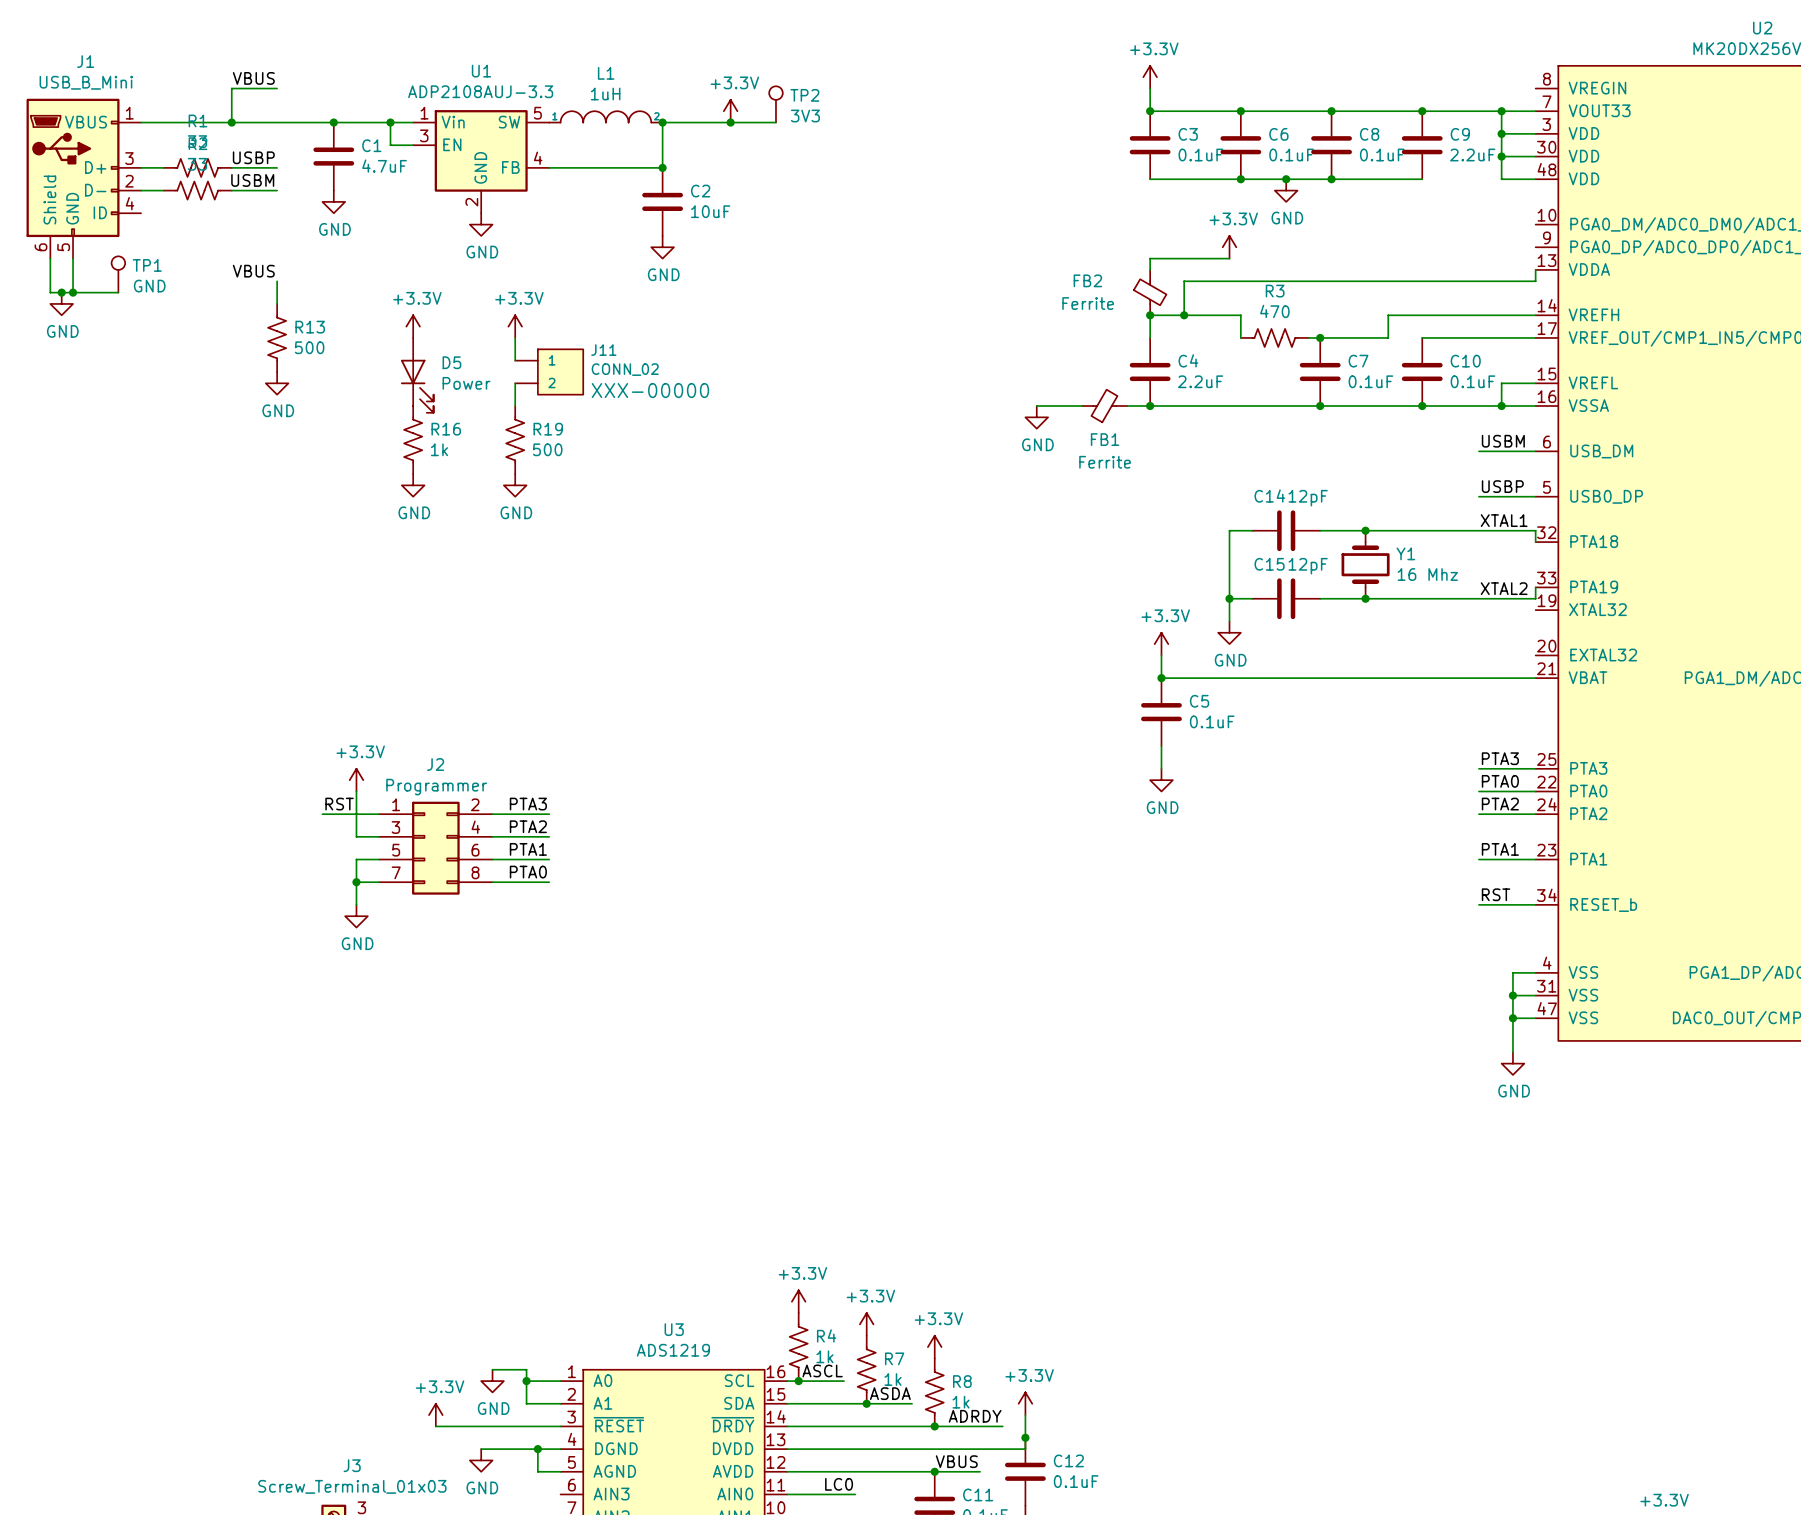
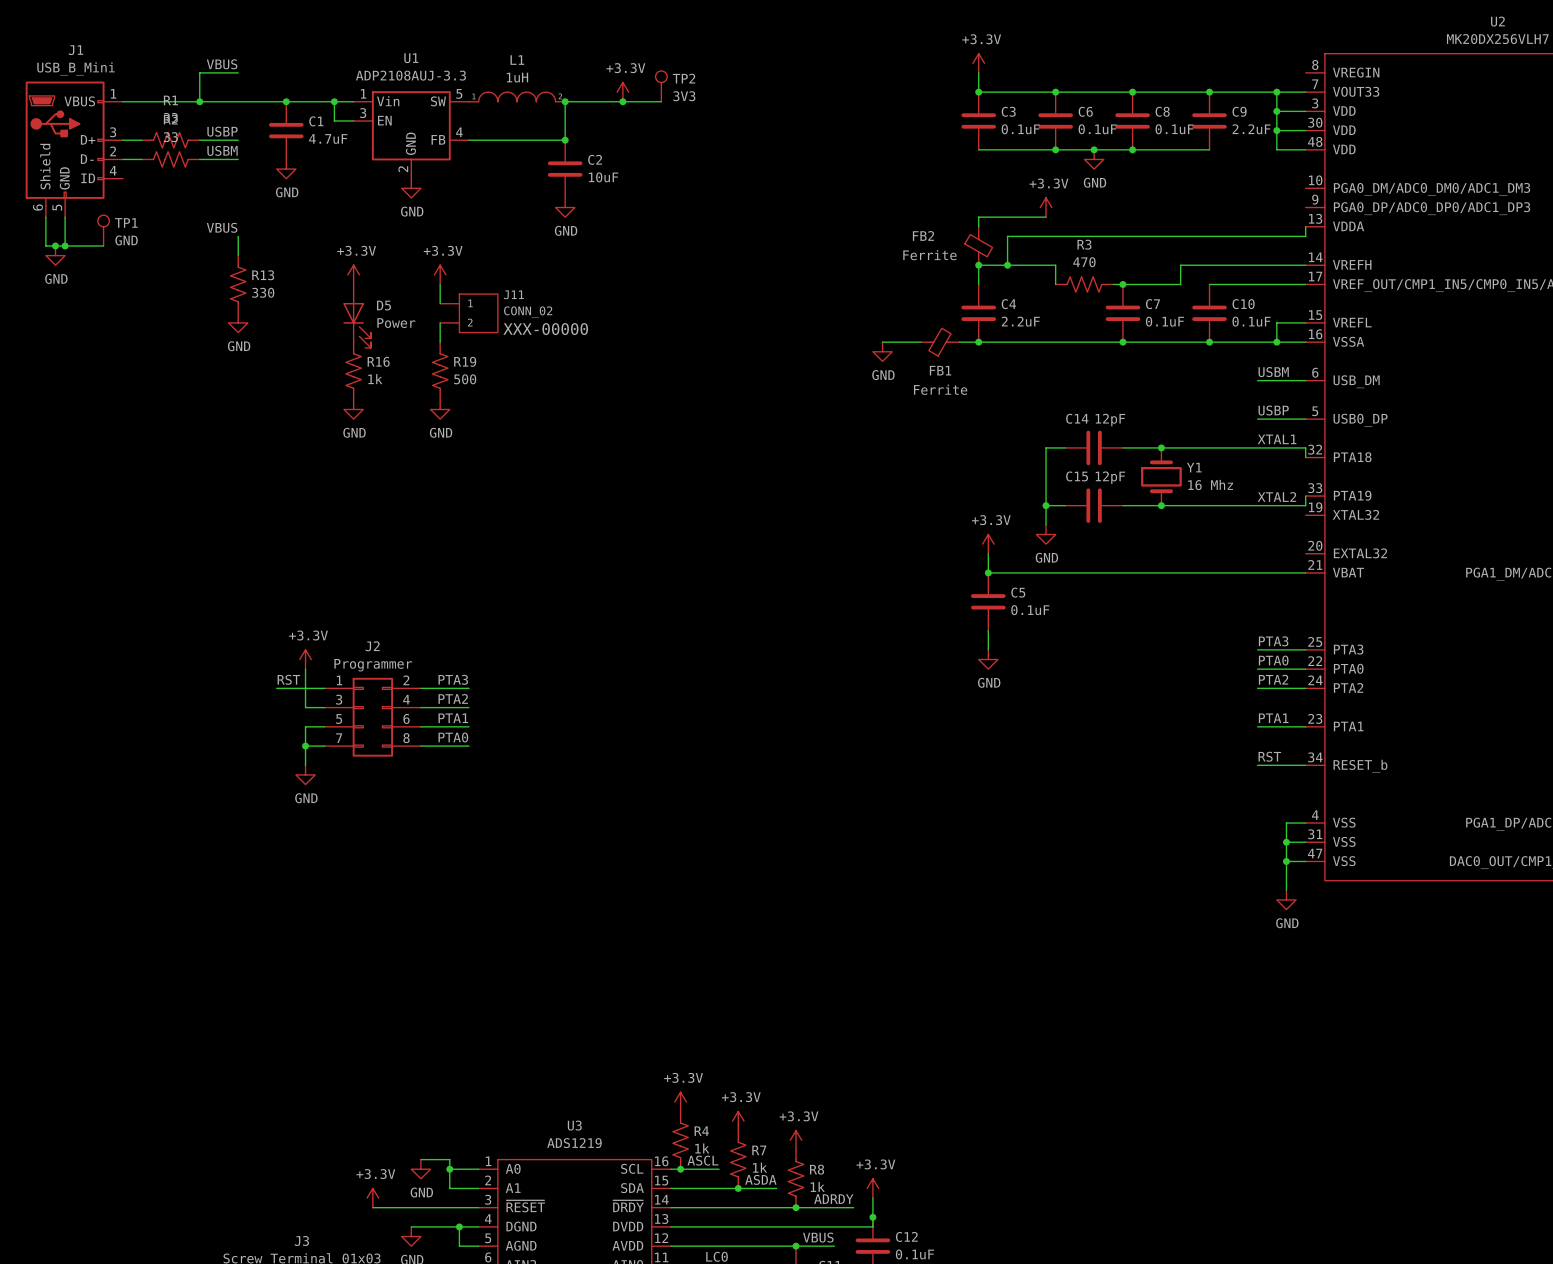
R13 value: 500 (309, 347) -> 330 (263, 292)

